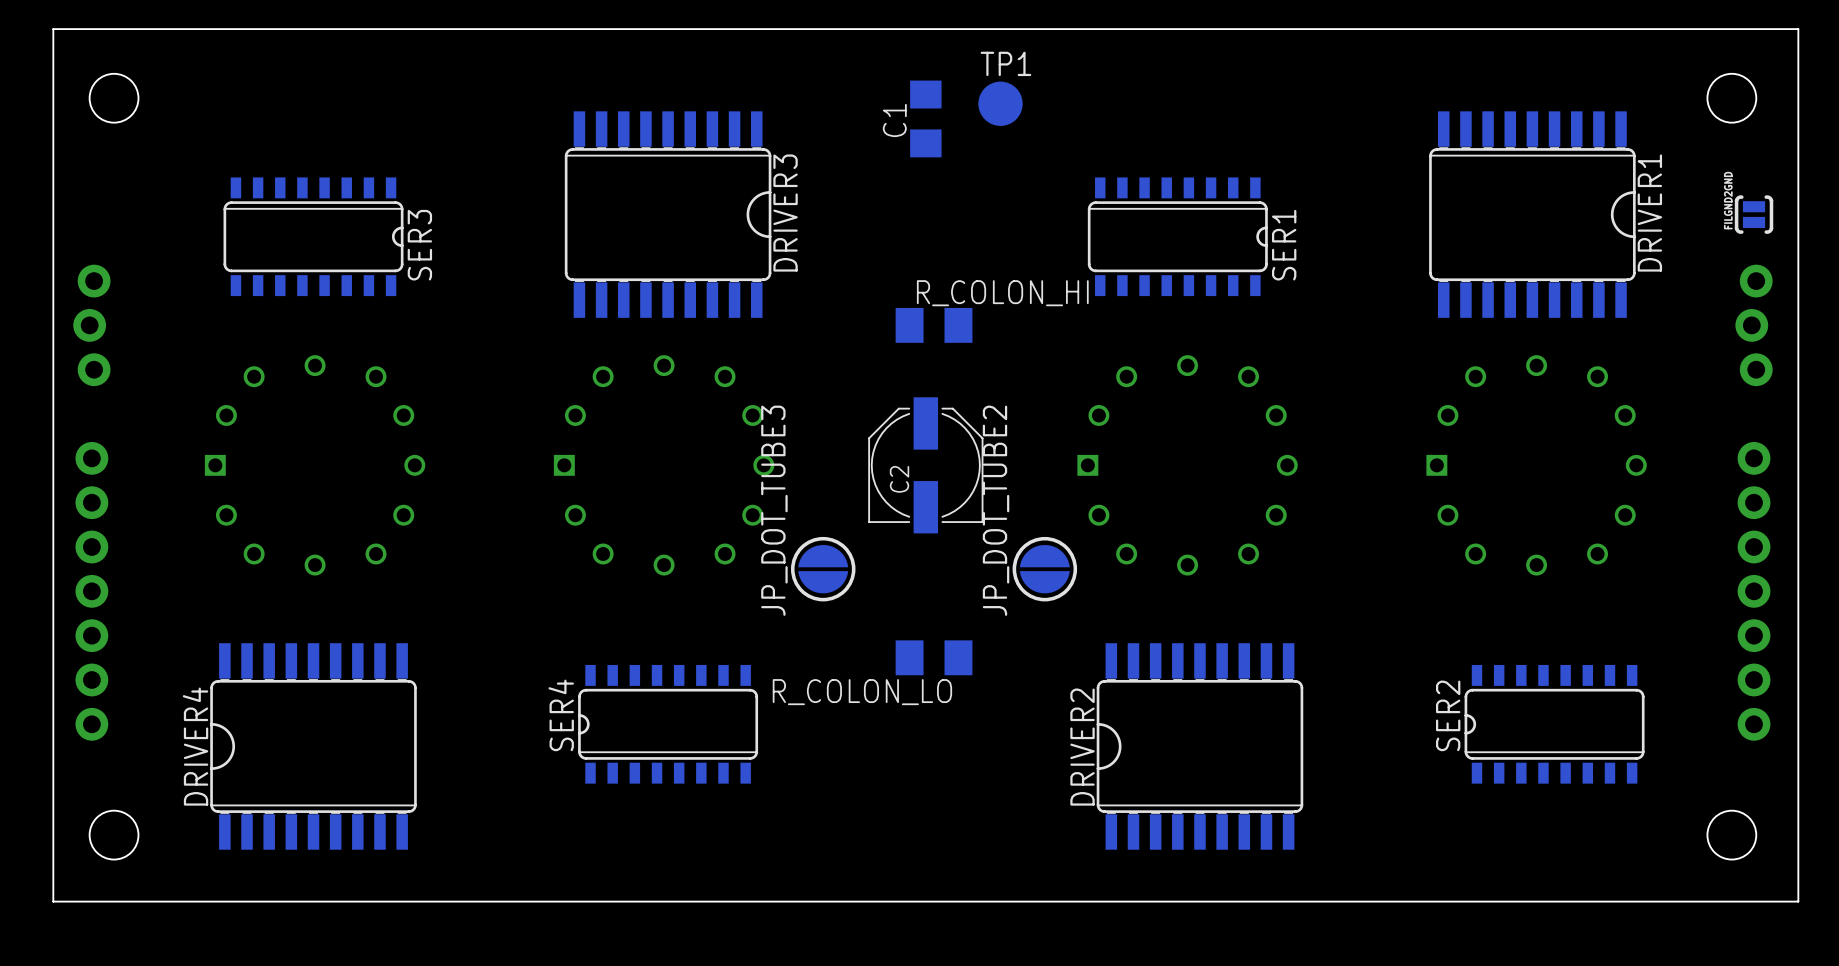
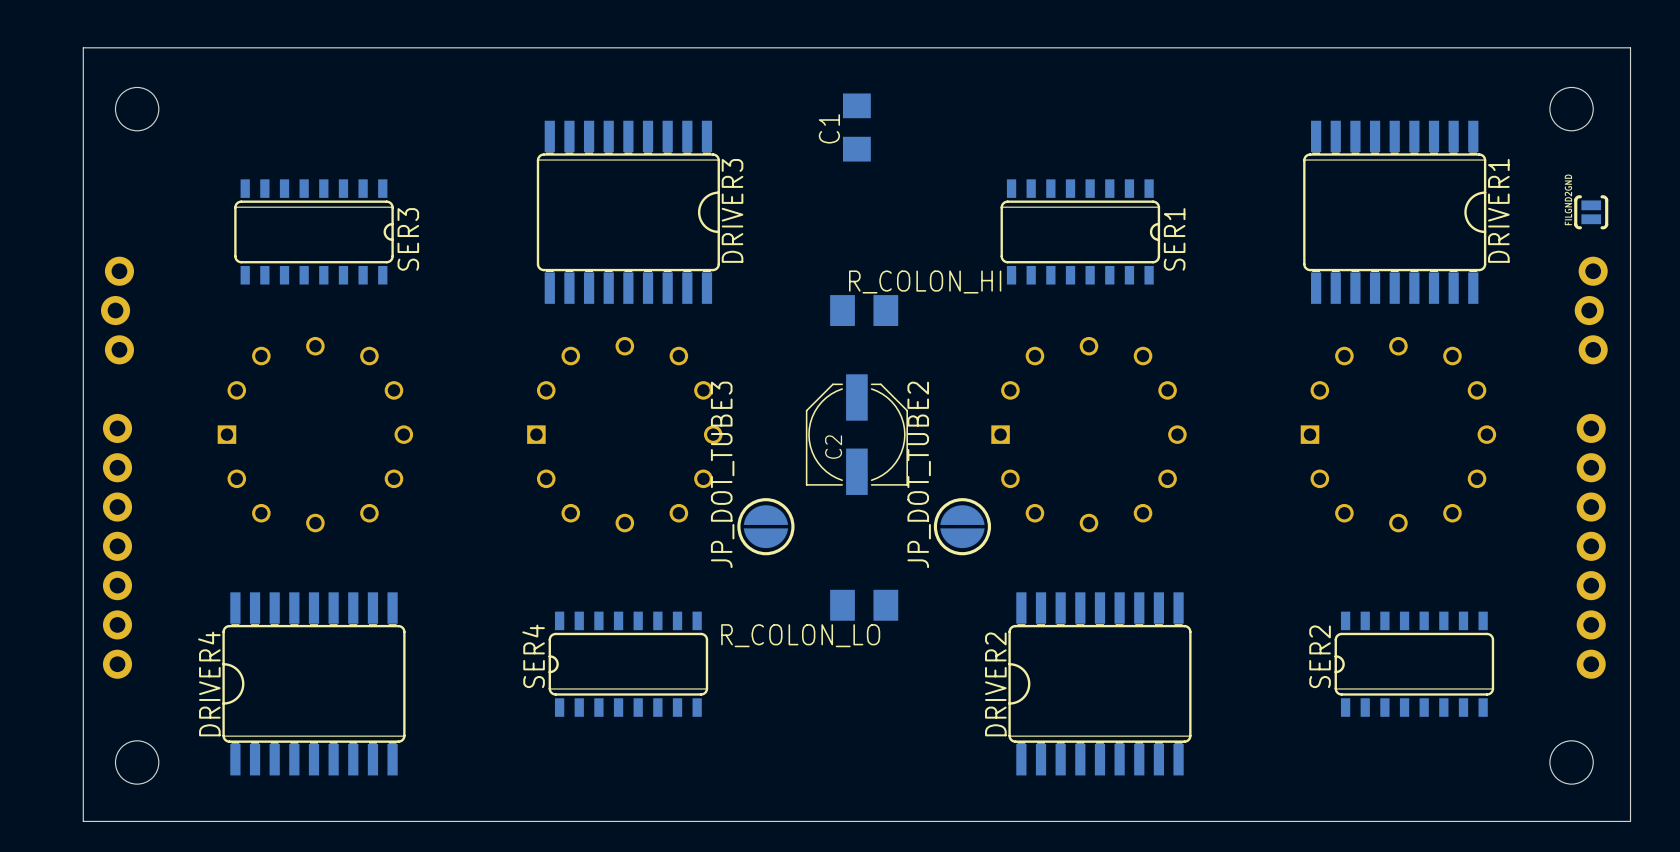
TP1: (1000, 103) -> none

